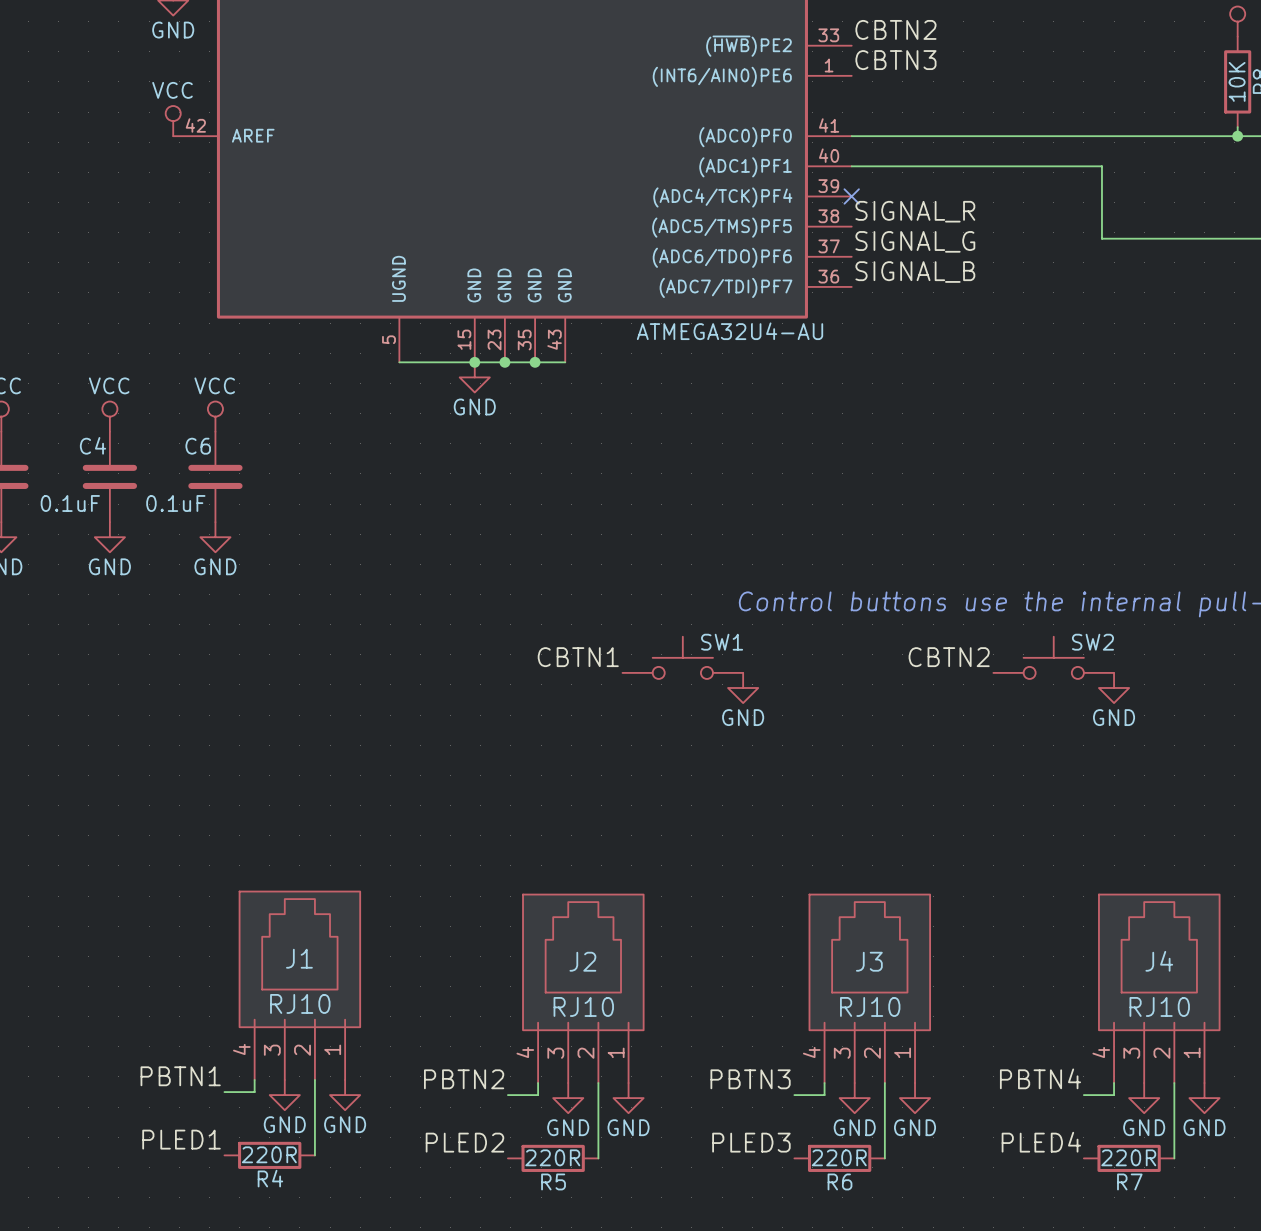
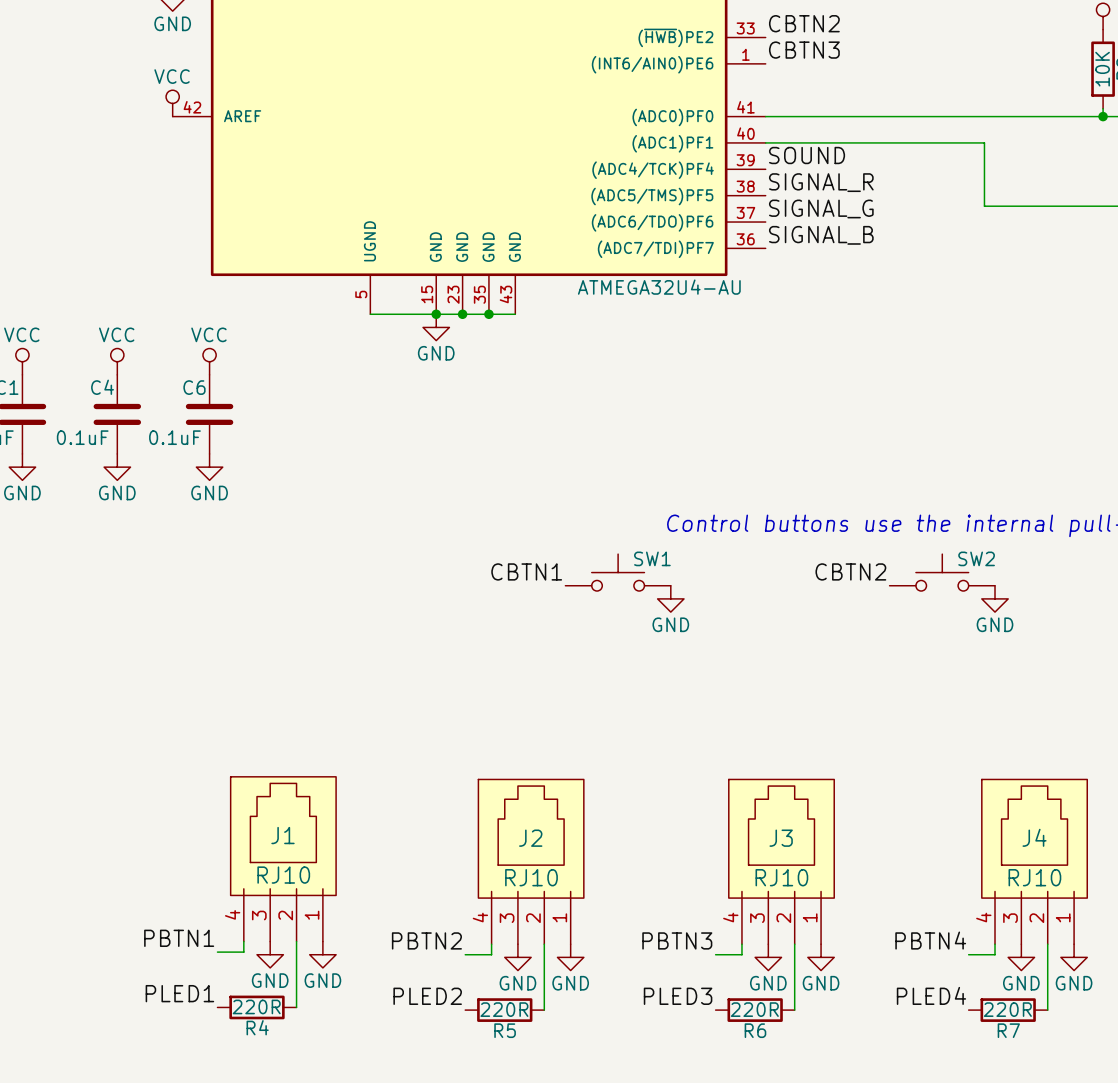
label: none -> SOUND (807, 155)
no-connect mark: (851, 196) -> none

